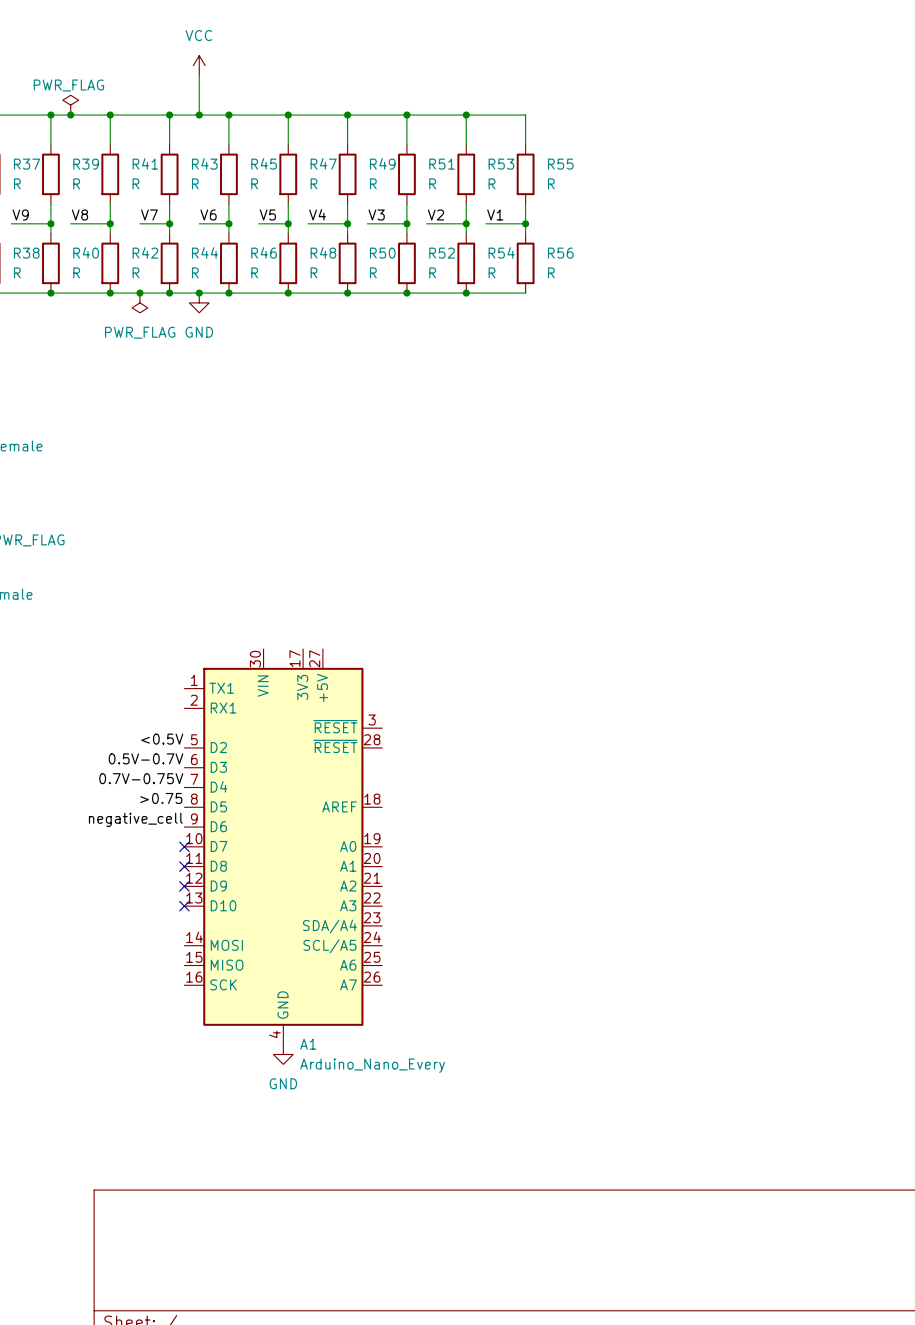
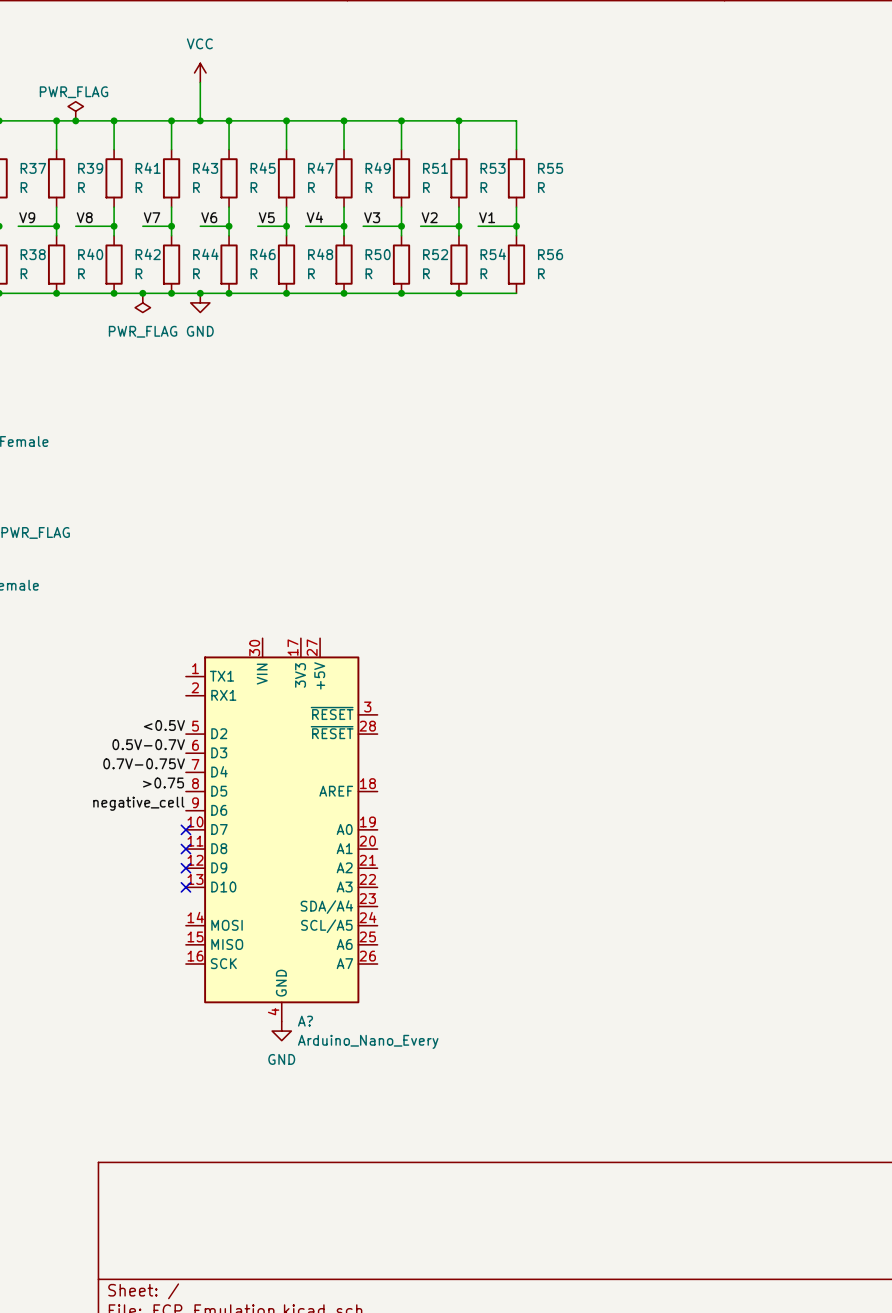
A1 name: A1 (308, 1044) -> A? (305, 1021)

